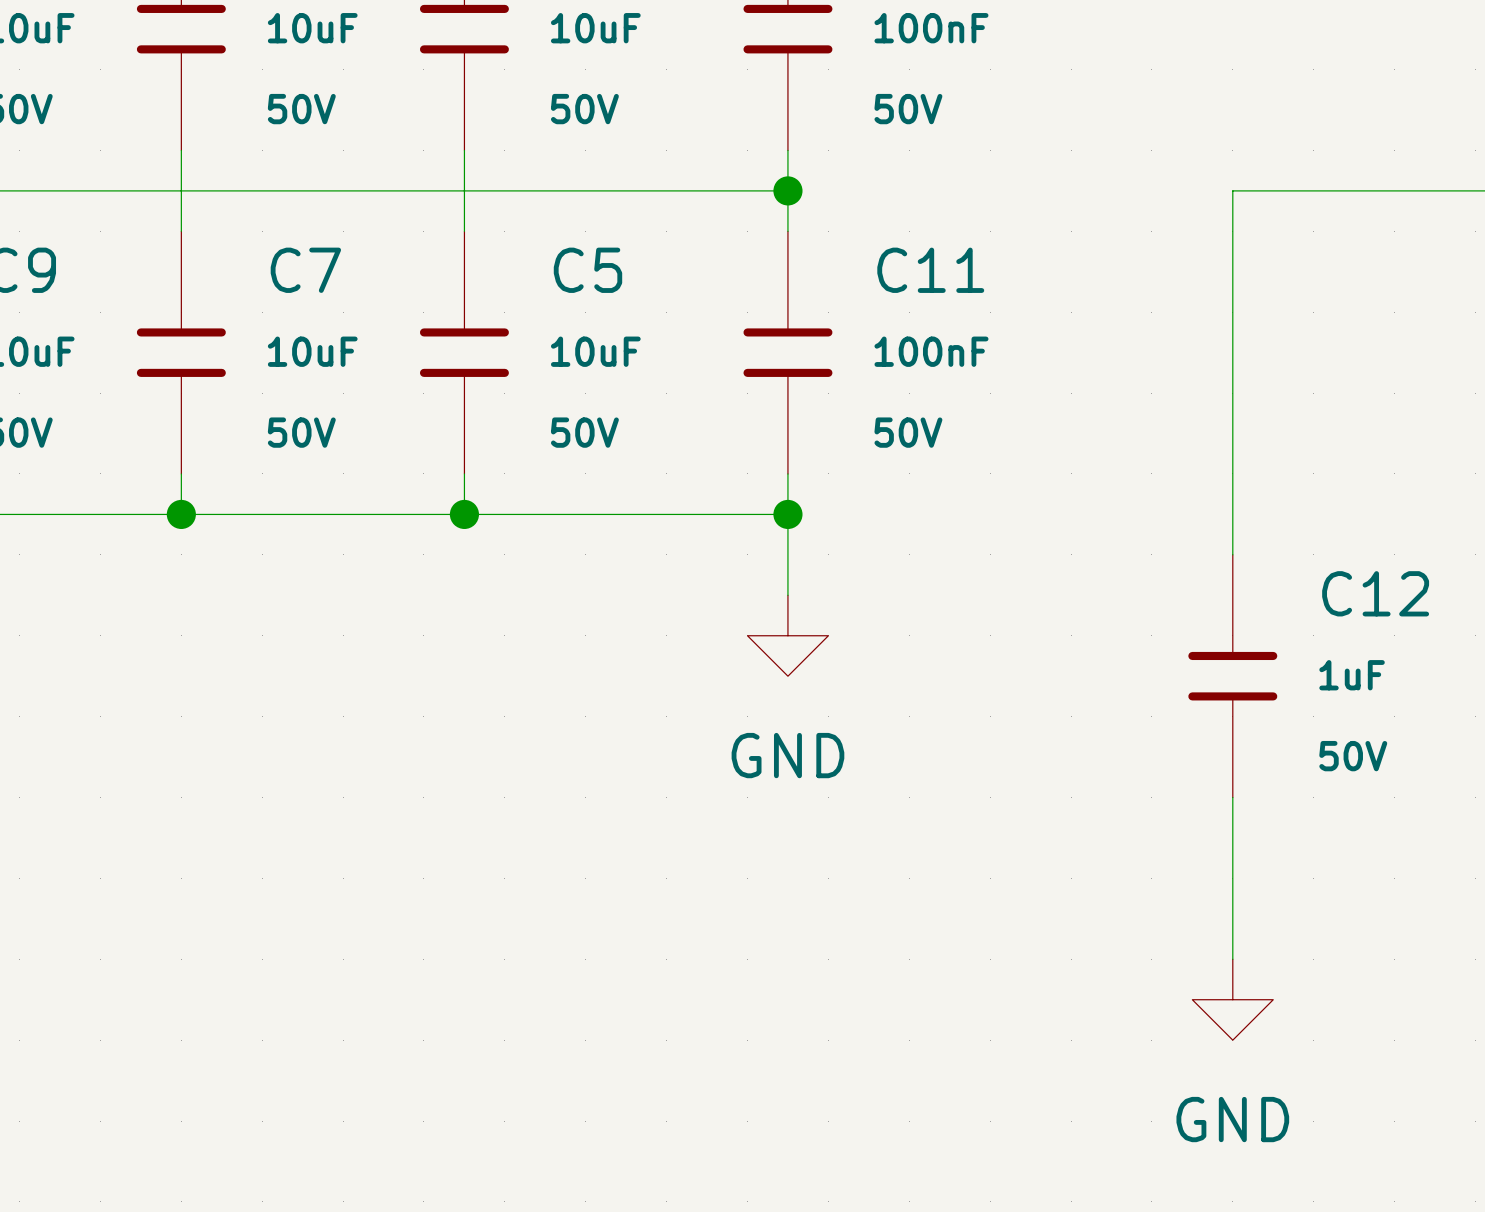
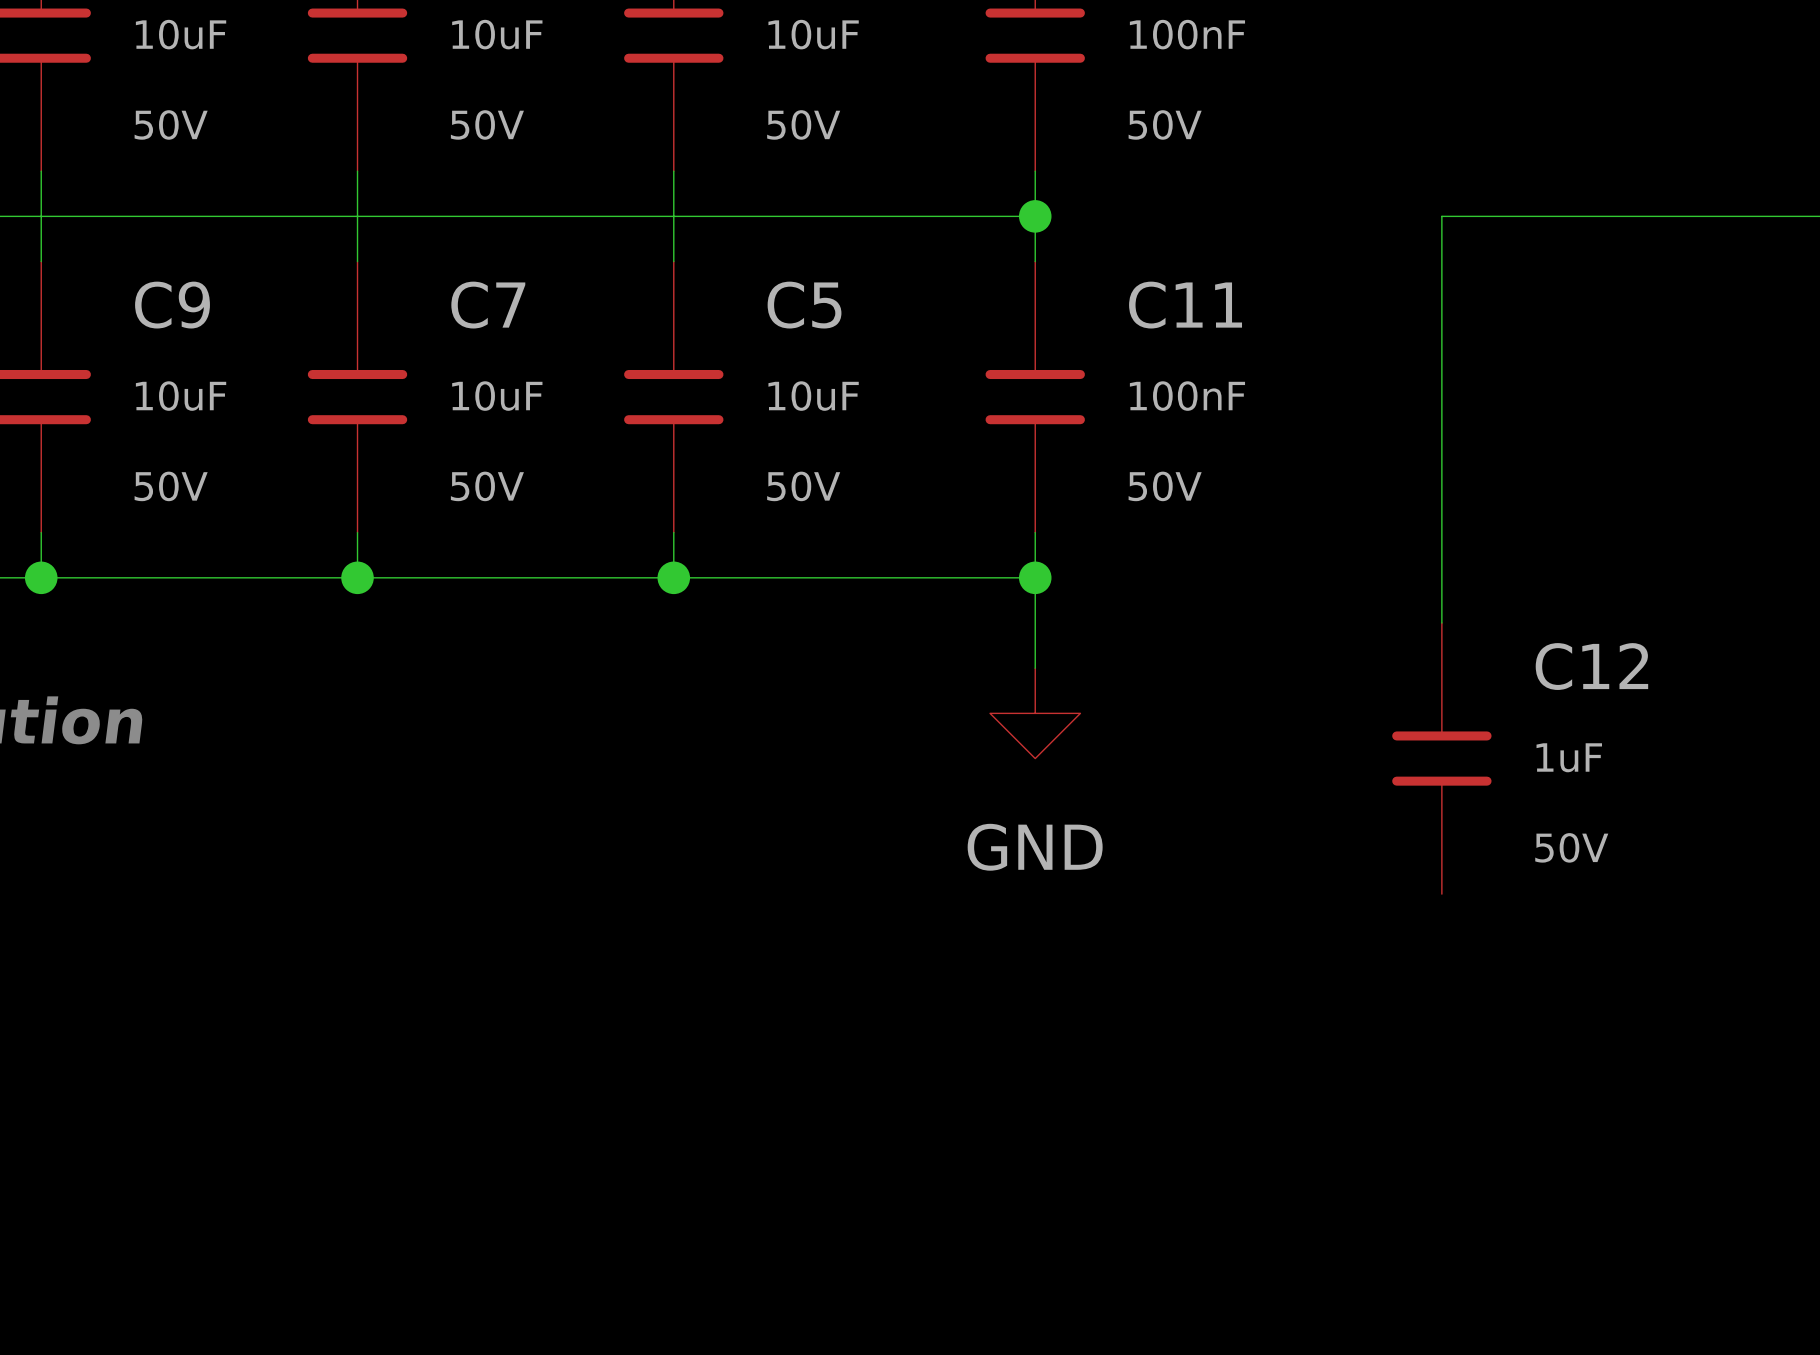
wire: (1232, 190) (1232, 554) -> (1532, 216) (1441, 216) (1441, 623)
C12 position: (1232, 676) -> (1441, 758)
wire: (1232, 797) (1232, 959) -> none
power symbol: GND (1232, 999) -> none

